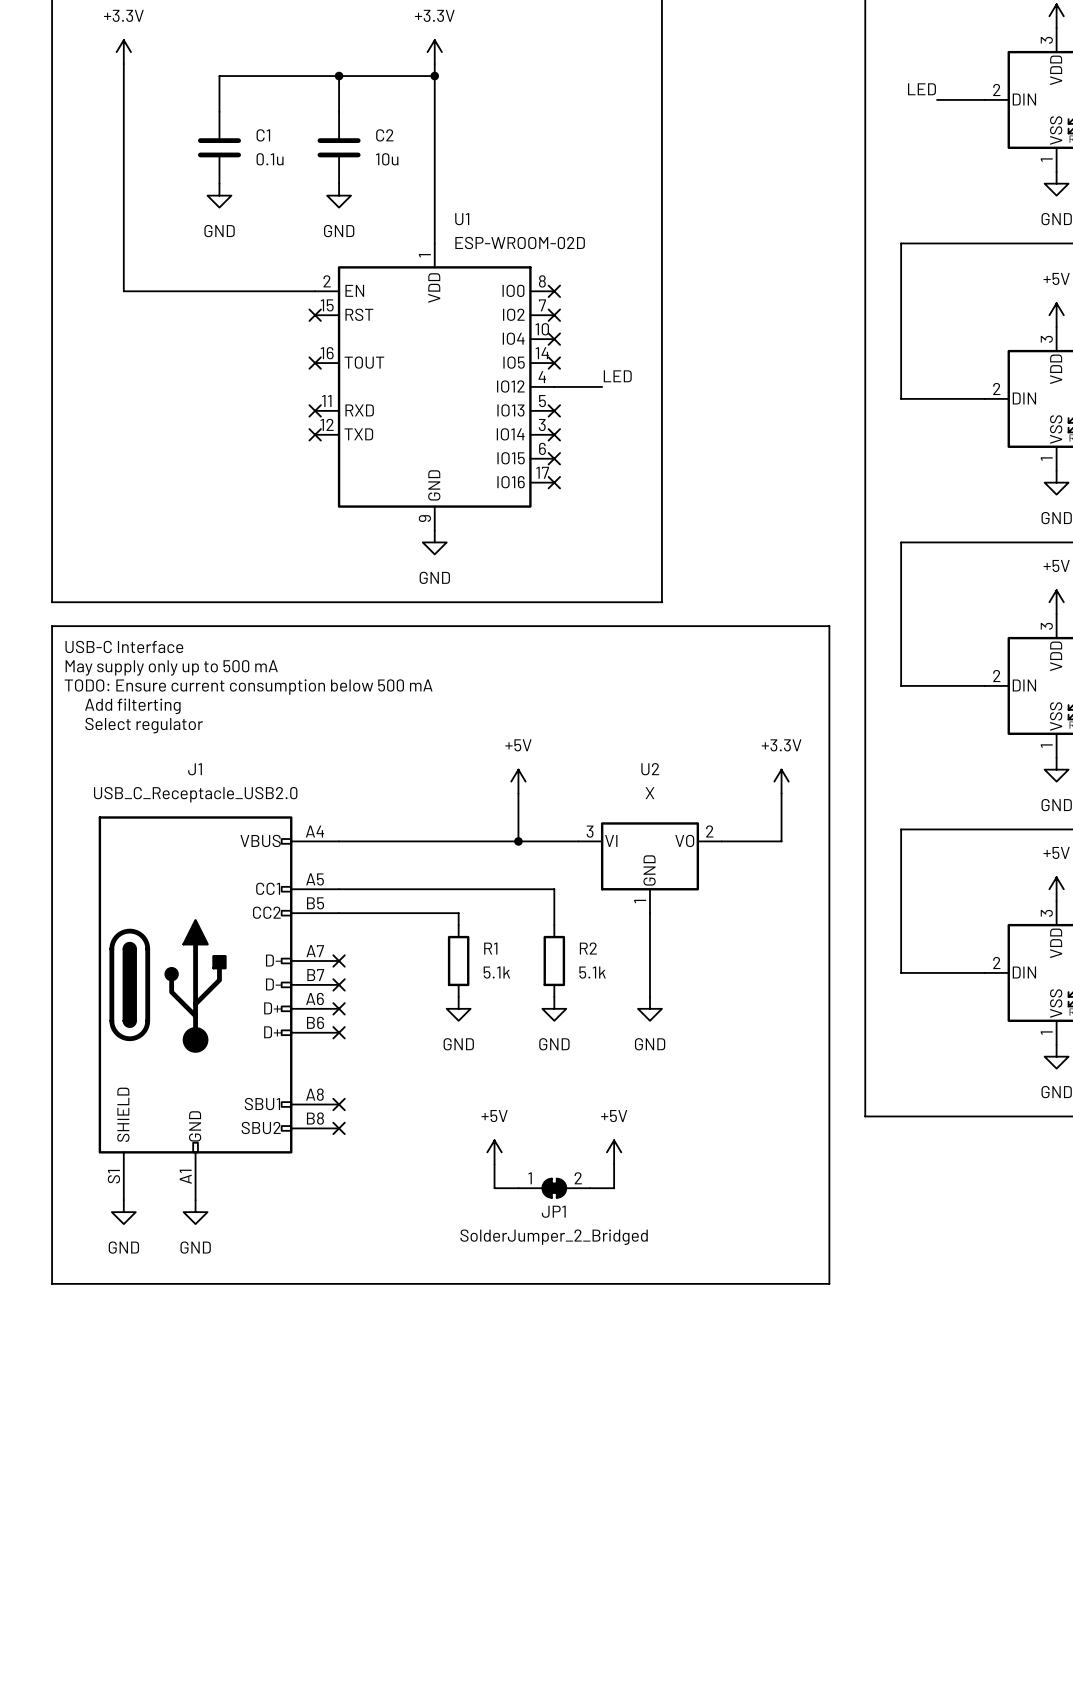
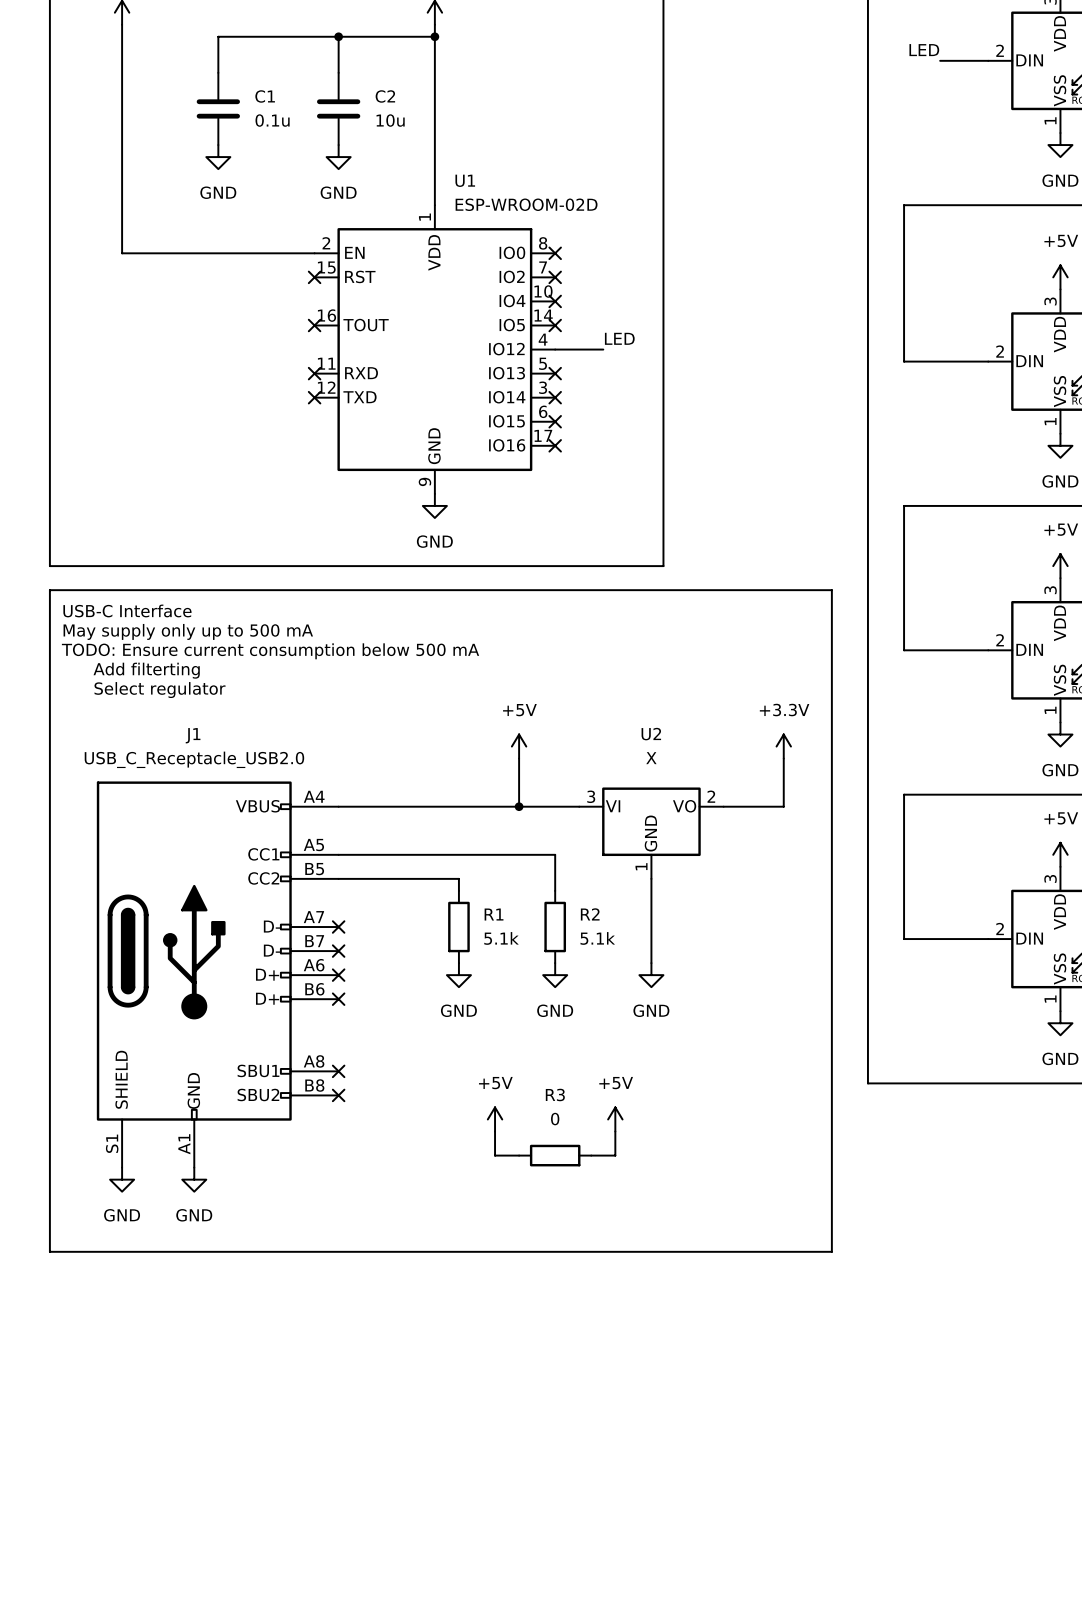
JP1: SolderJumper_2_Bridged (554, 1188) -> none
R3: none -> 0 (555, 1155)

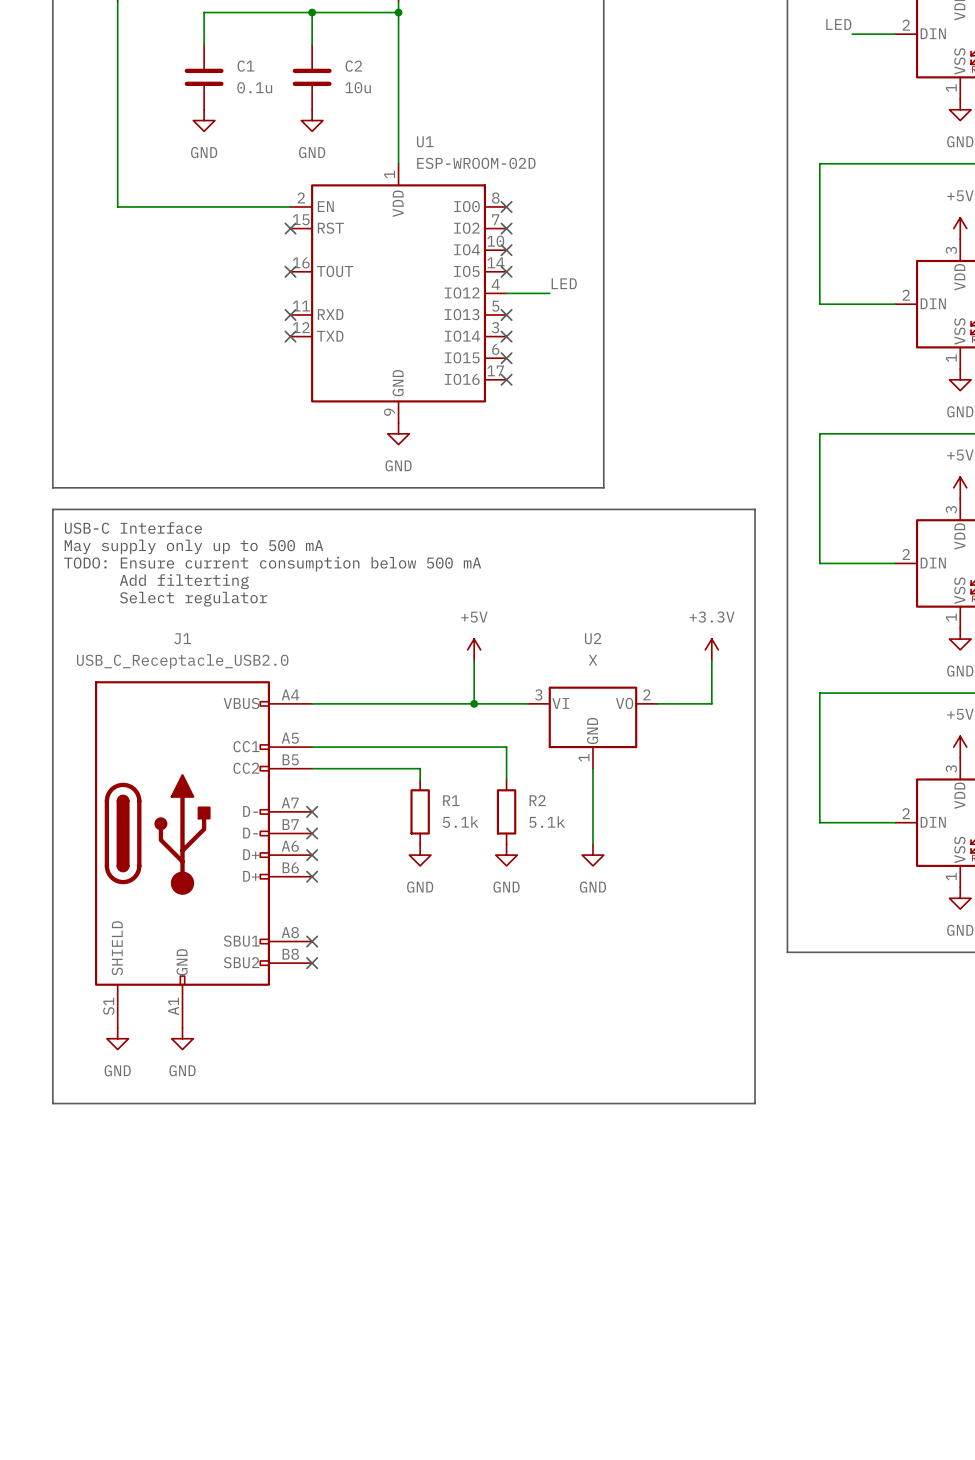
power symbol: +5V (495, 1119) -> none
power symbol: +5V (615, 1119) -> none
wire: (495, 1131) (495, 1155) (519, 1155) -> none
wire: (615, 1131) (615, 1155) (591, 1155) -> none
R3: 0 (555, 1155) -> none

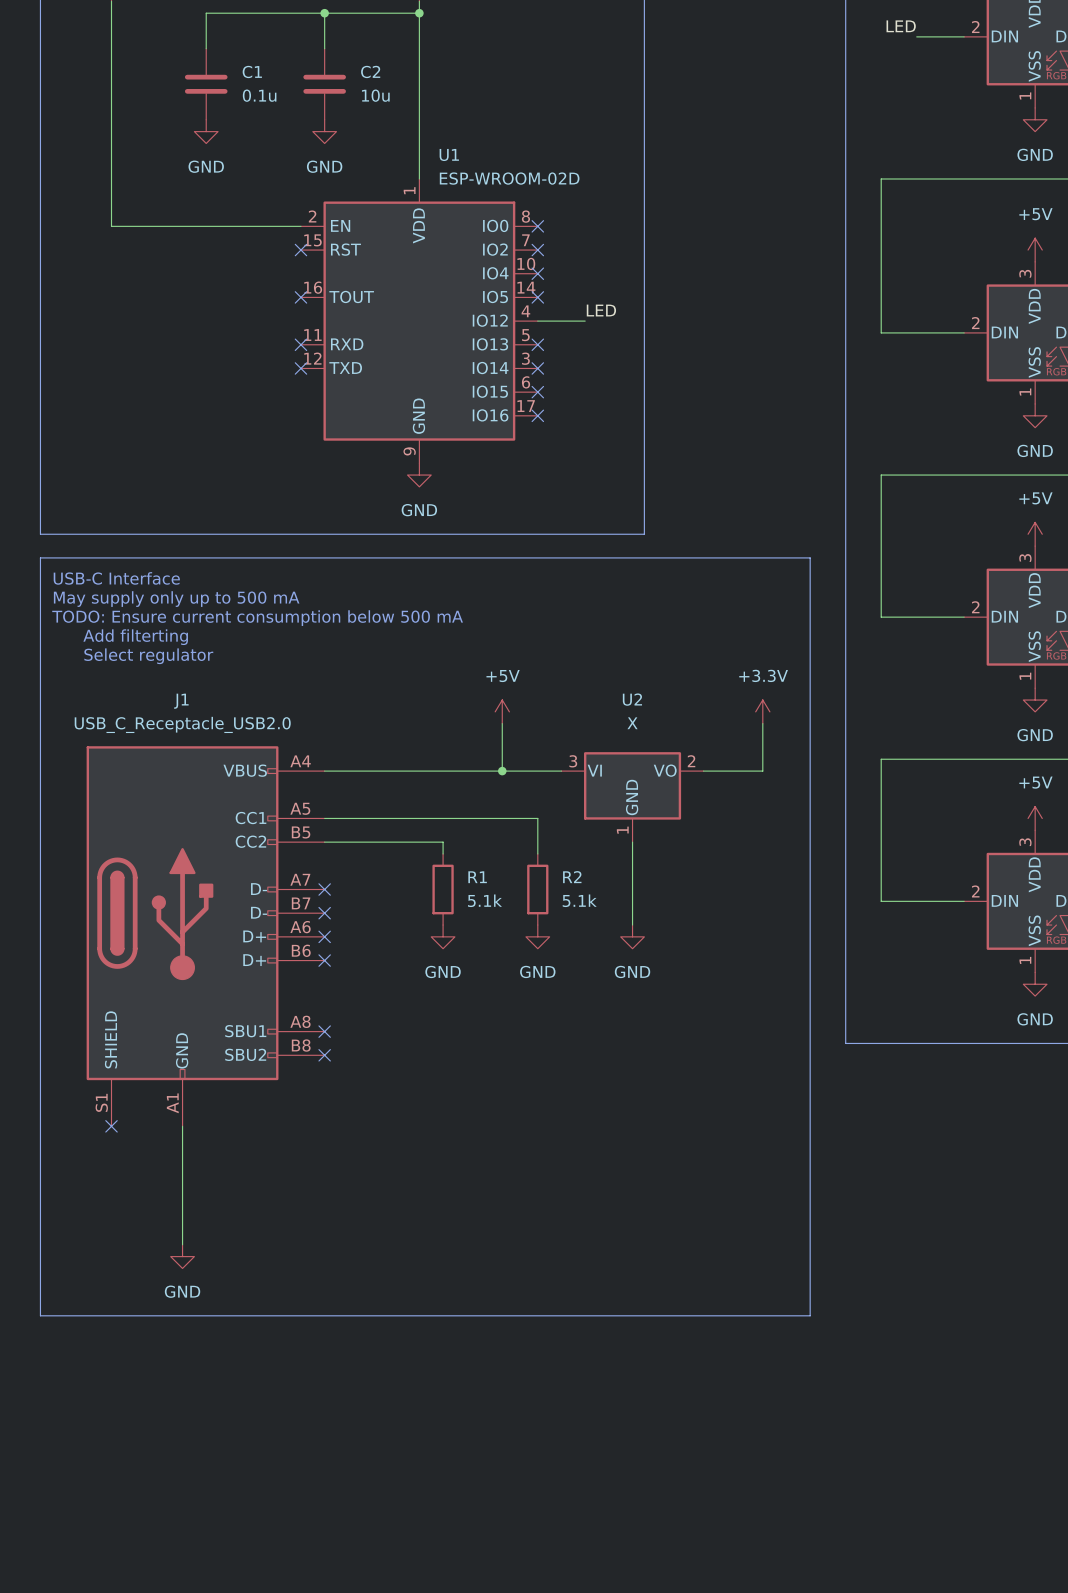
no-connect mark: none -> (111, 1126)
wire: none -> (182, 1126) (182, 1244)
power symbol: GND (117, 1038) -> none
power symbol: GND (182, 1038) -> none
line: (52, 1103) (755, 1103) -> (40, 1209) (40, 1315) (810, 1315) (810, 1209)
power symbol: none -> GND (182, 1256)

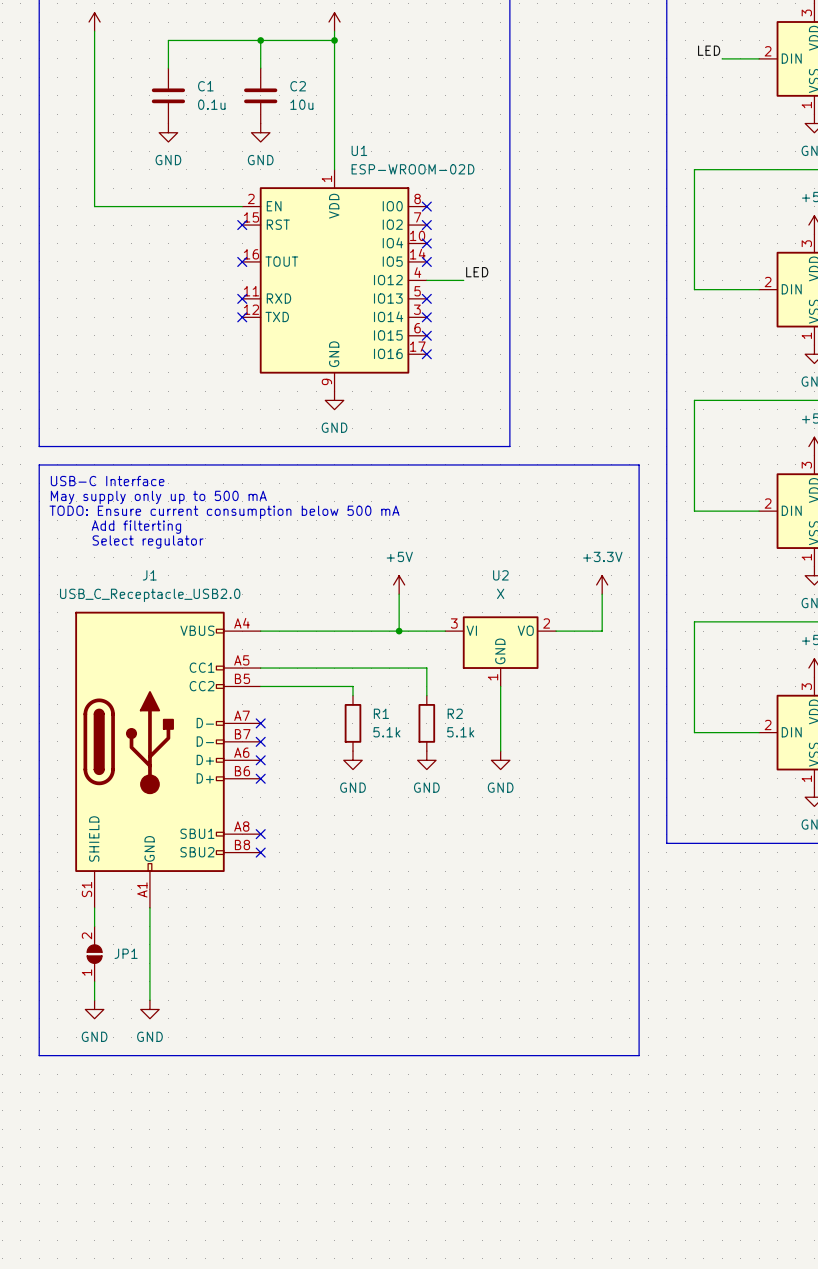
wire: none -> (94, 907) (94, 926)
no-connect mark: (111, 1126) -> none
JP1: none -> (94, 954)
wire: none -> (94, 981) (94, 1000)
power symbol: none -> GND (94, 1009)

